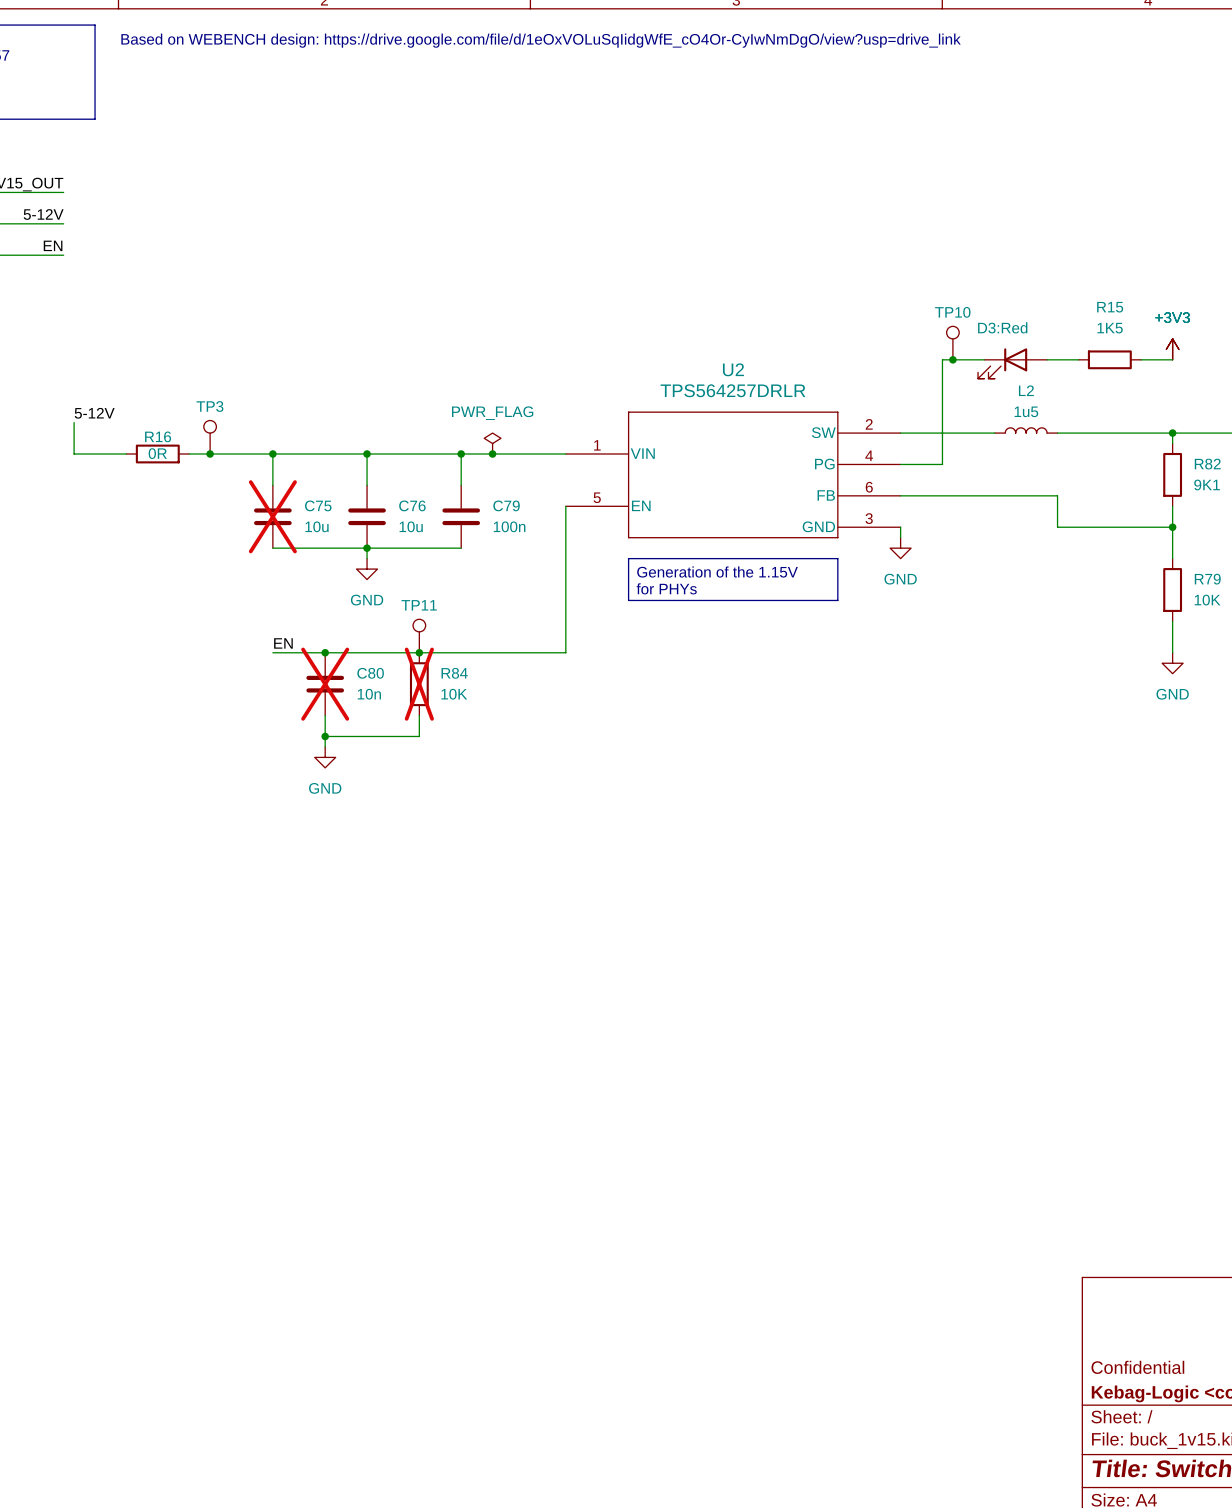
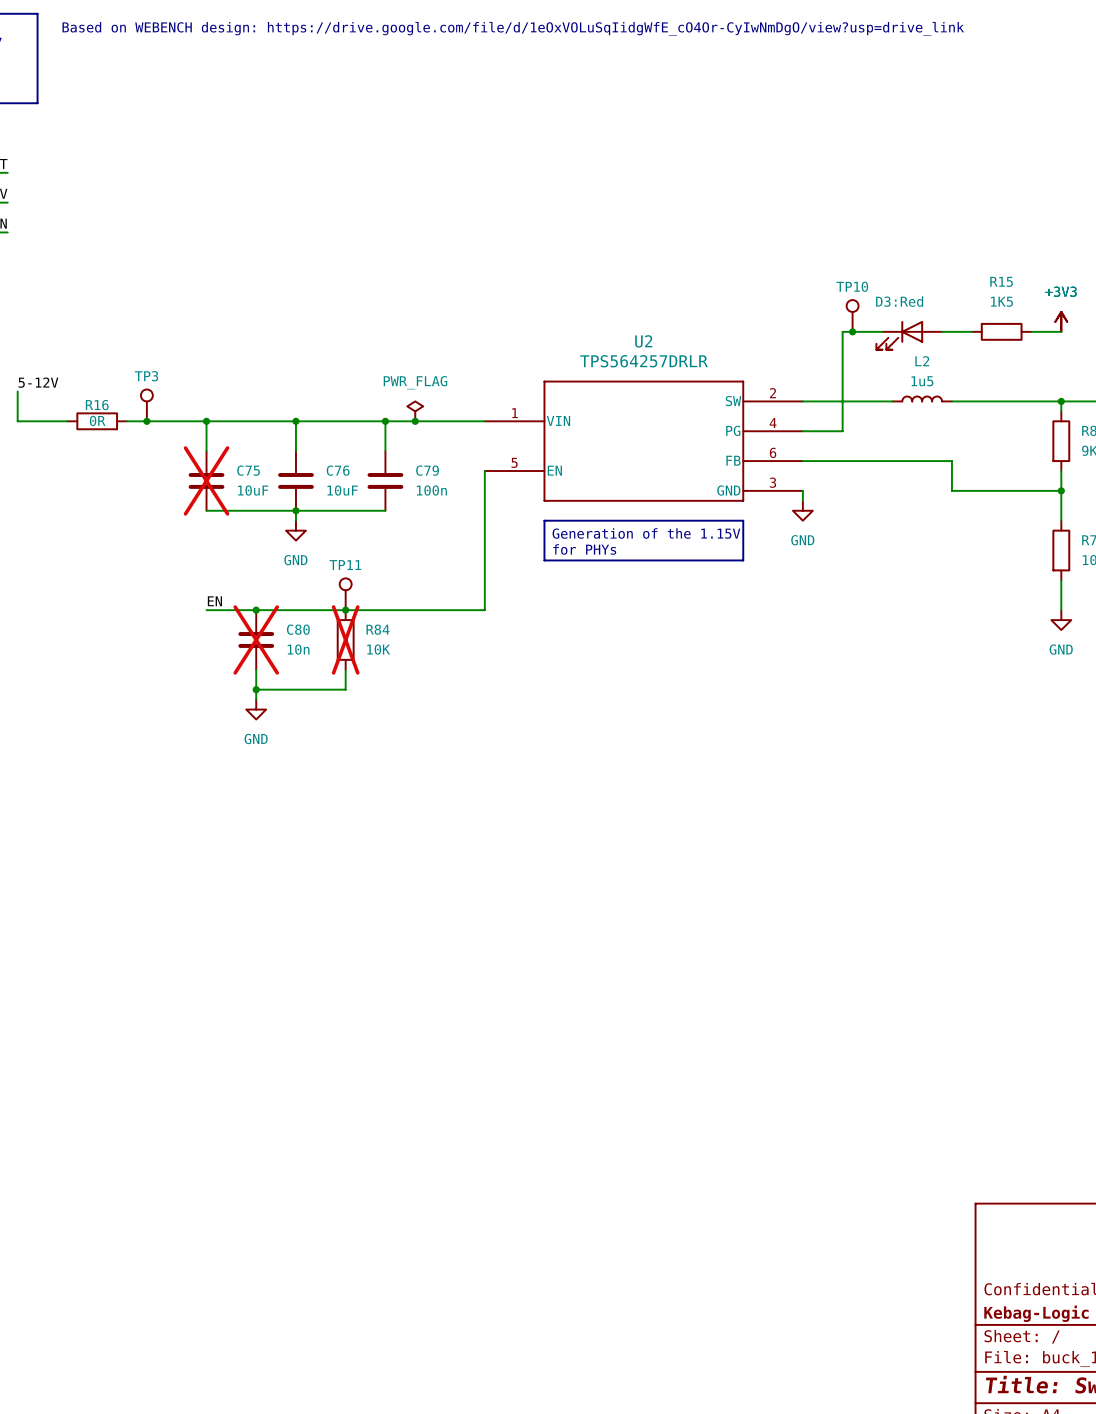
C75 value: 10u (317, 526) -> 10uF (253, 490)
C76 value: 10u (411, 526) -> 10uF (342, 490)

